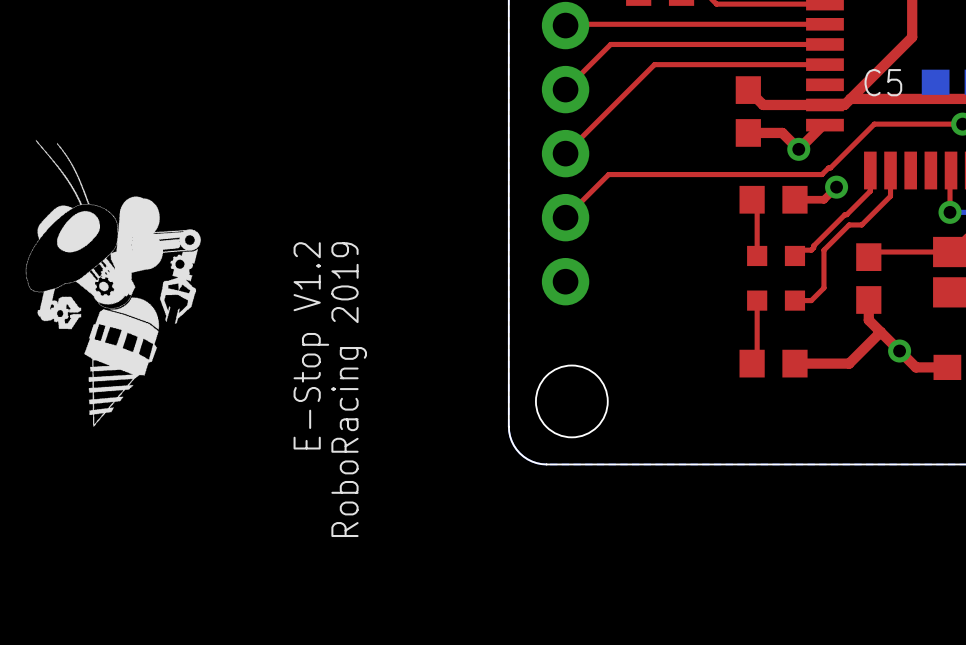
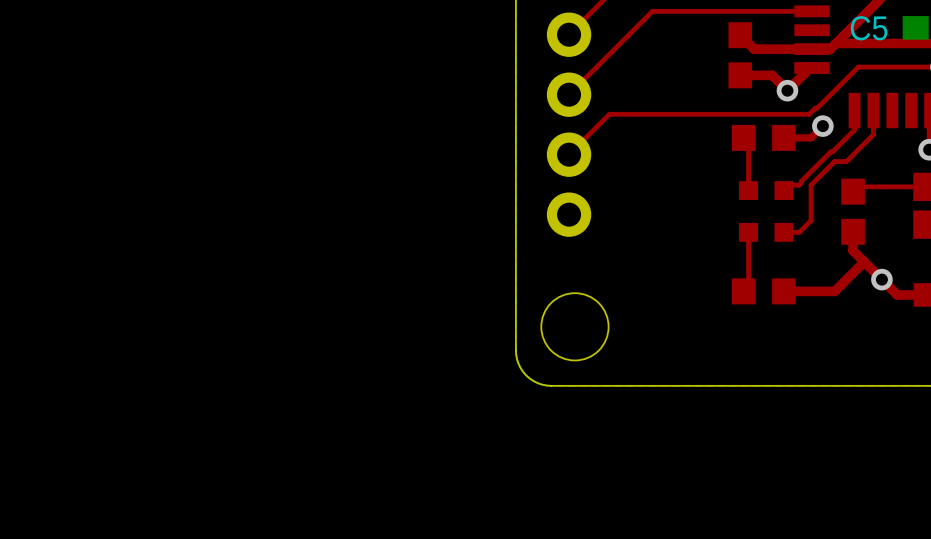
drawing: [25, 139, 202, 427] -> none
text: E-Stop V1.2 (311, 345) -> none
text: RoboRacing 2019 (349, 389) -> none

